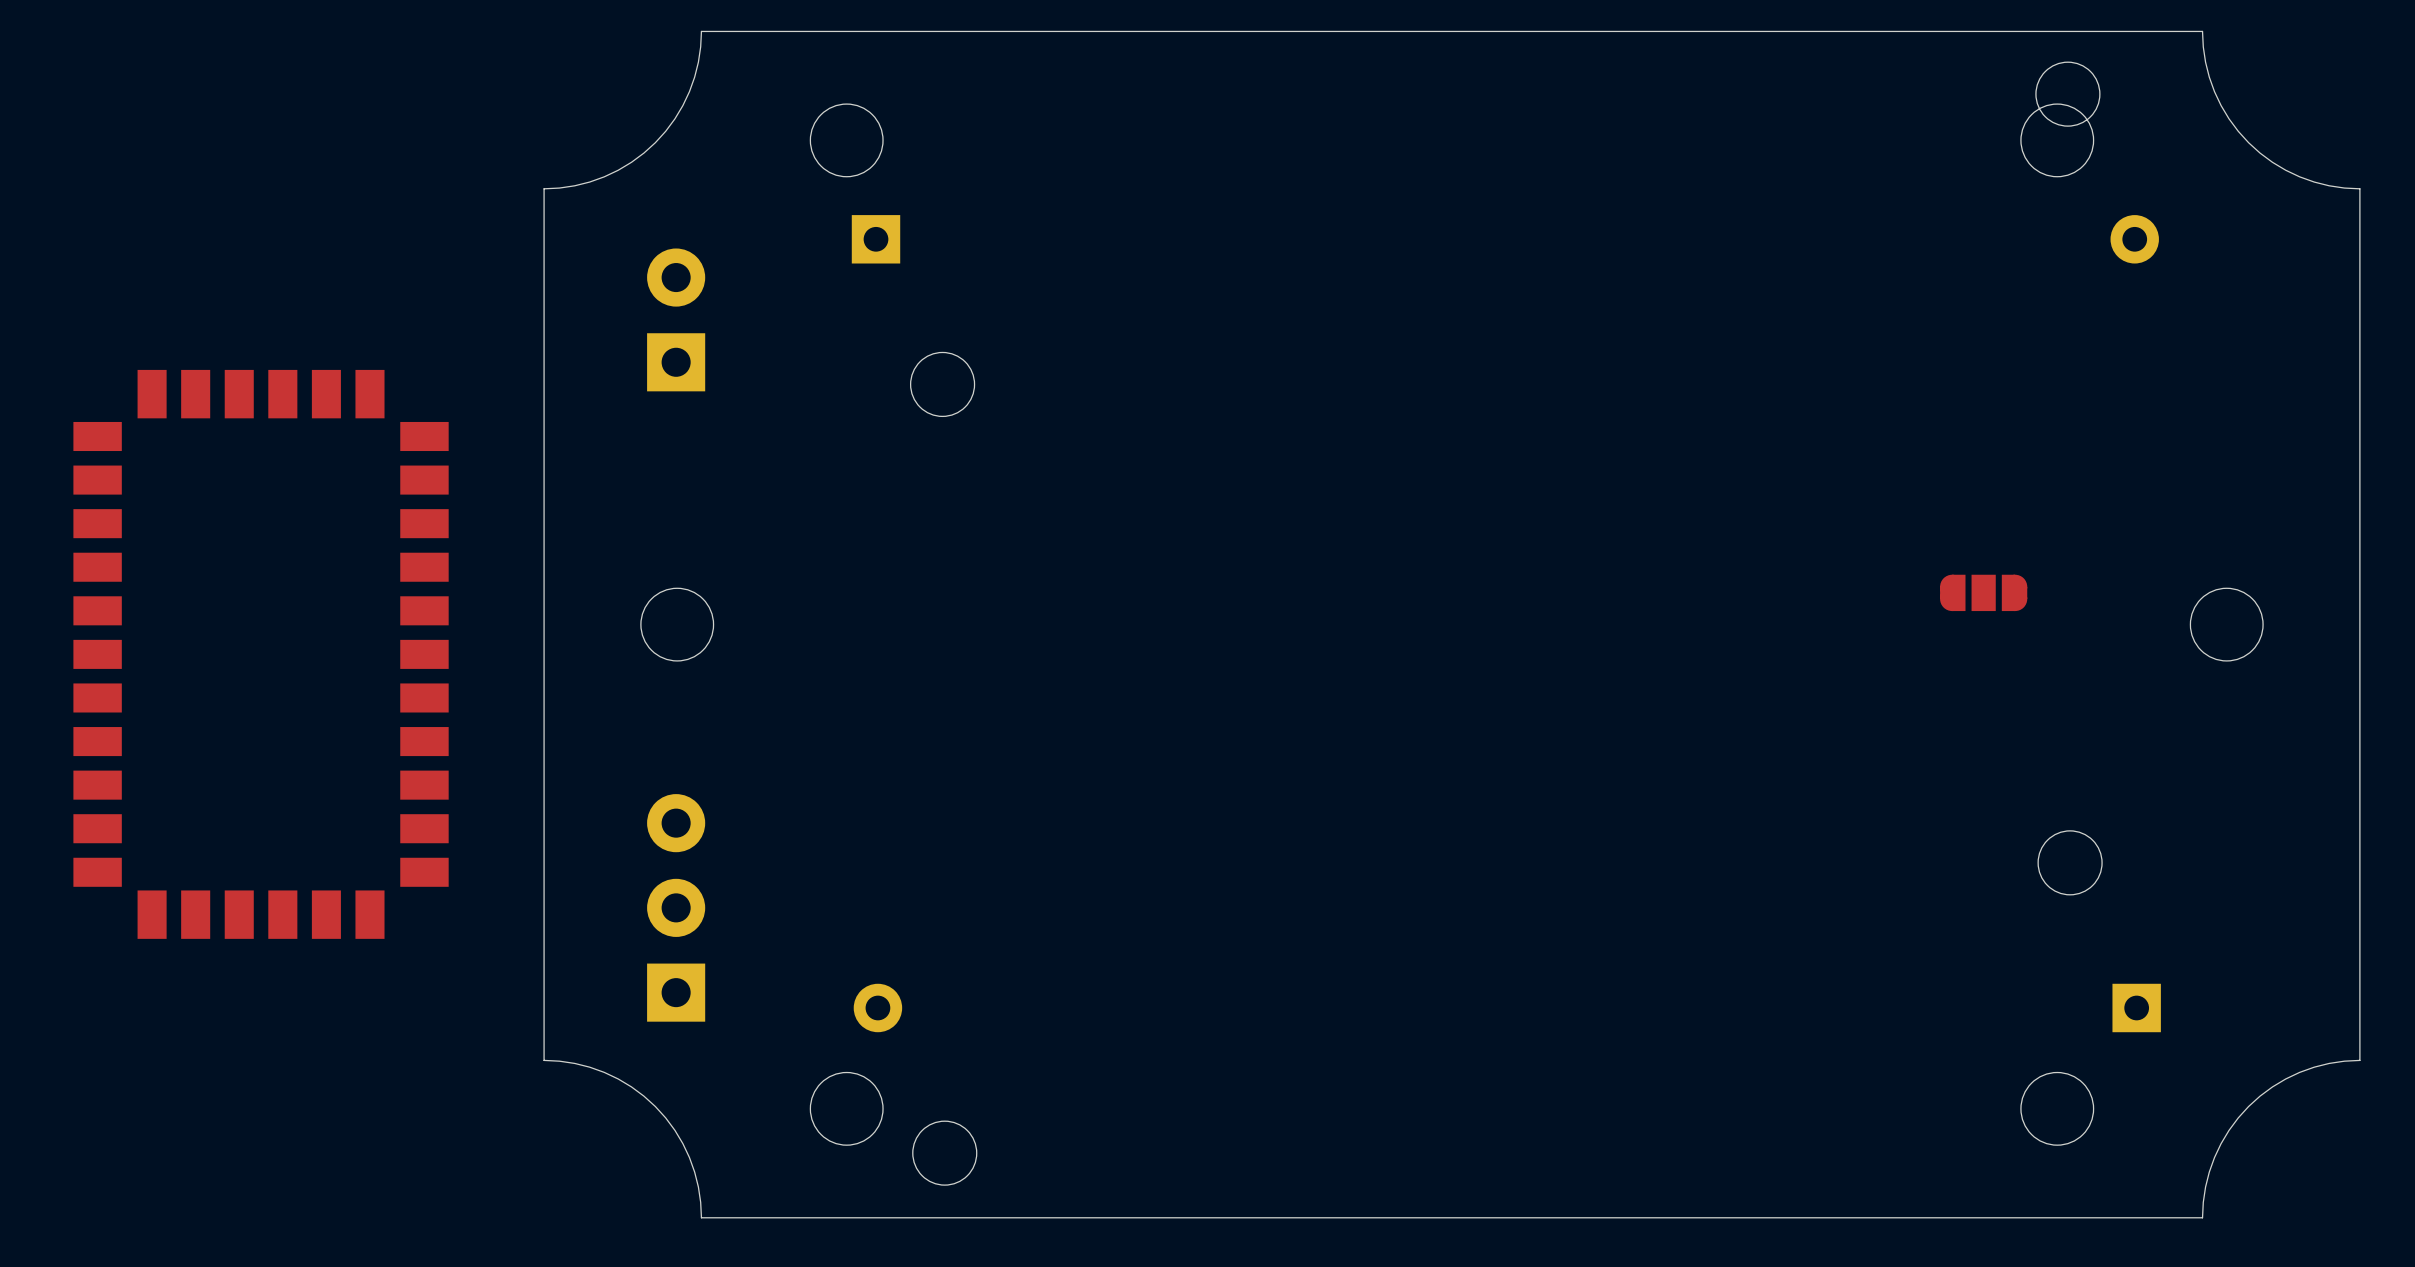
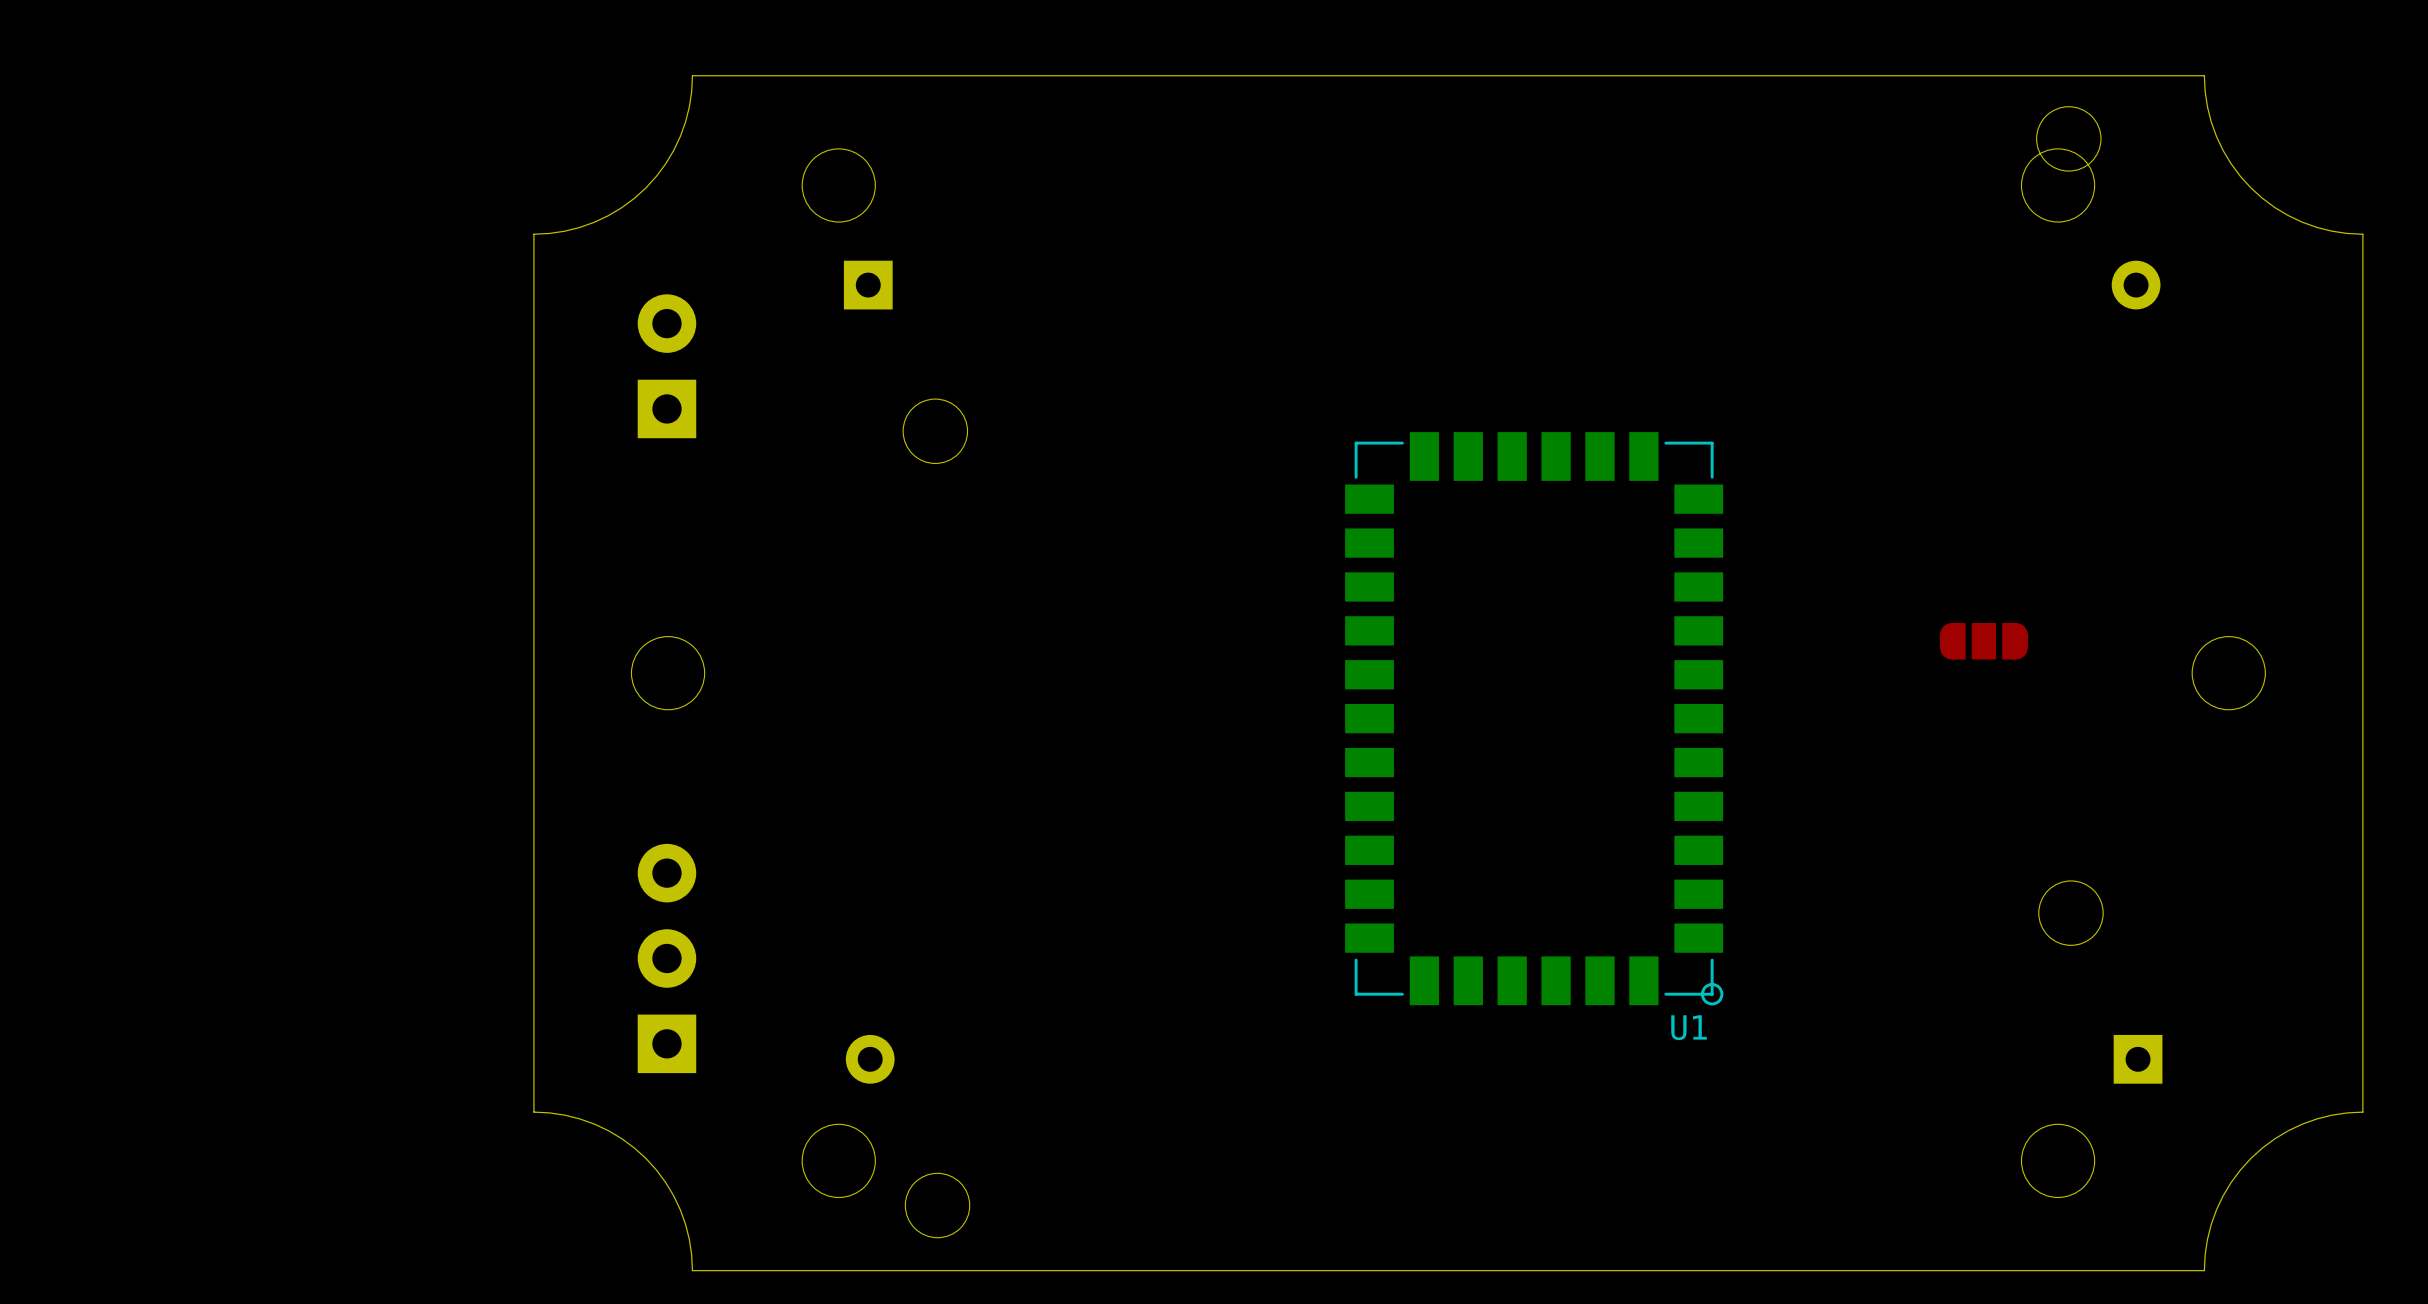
part: (261, 654) -> none
U1: none -> (1534, 718)

